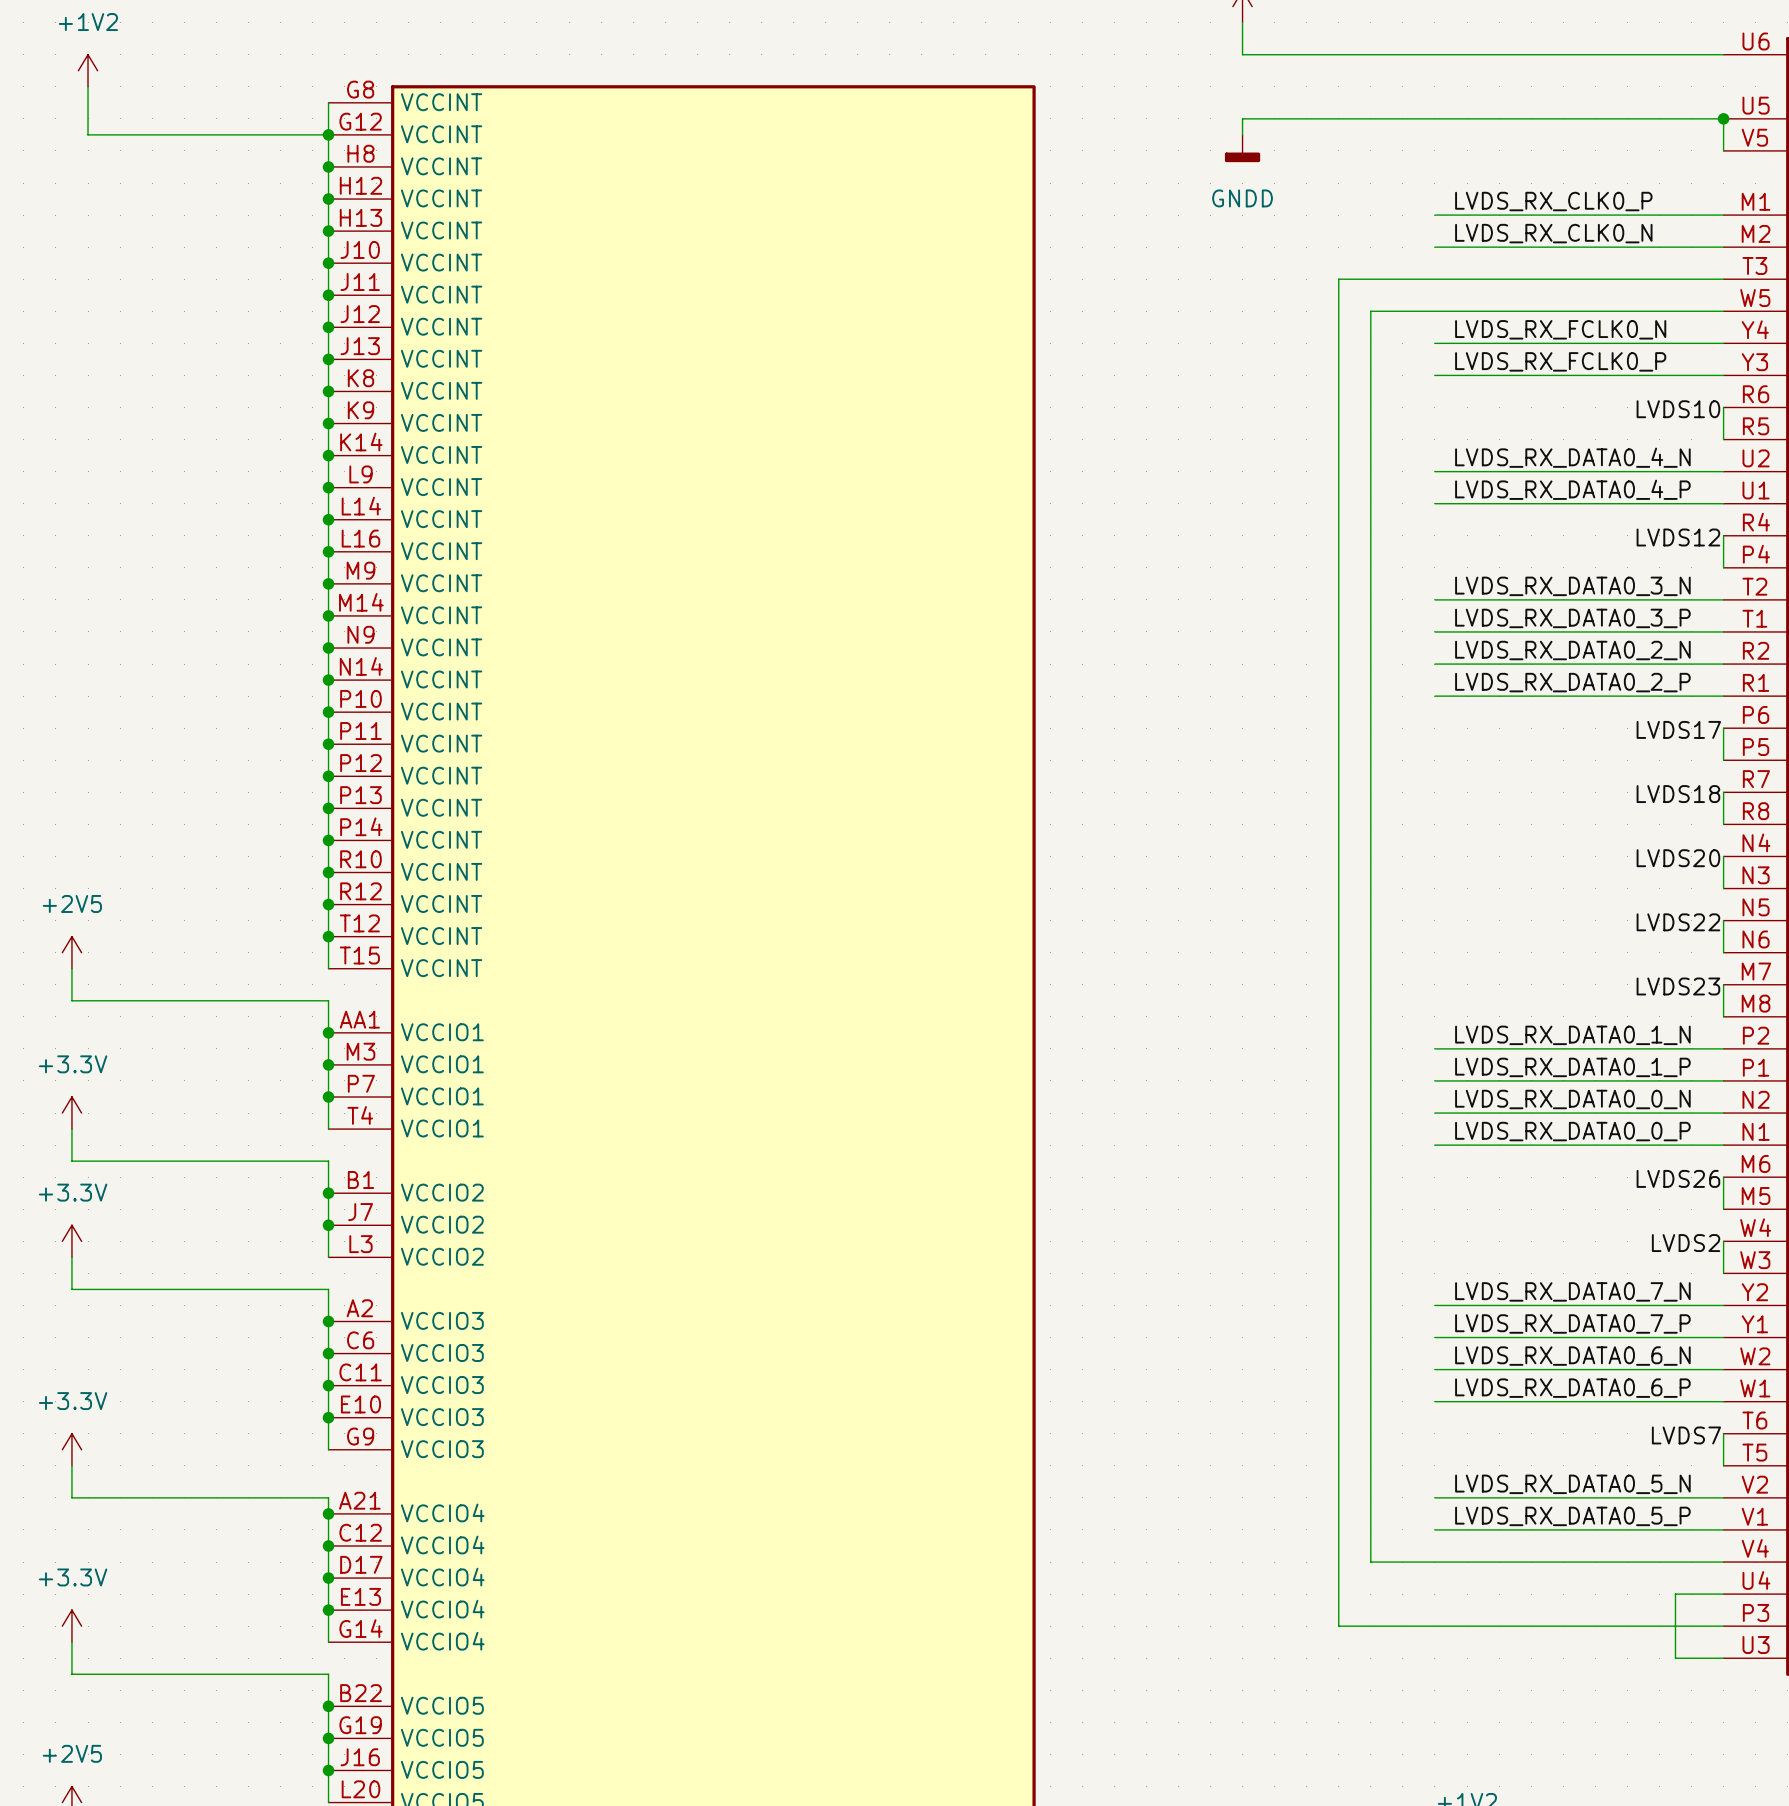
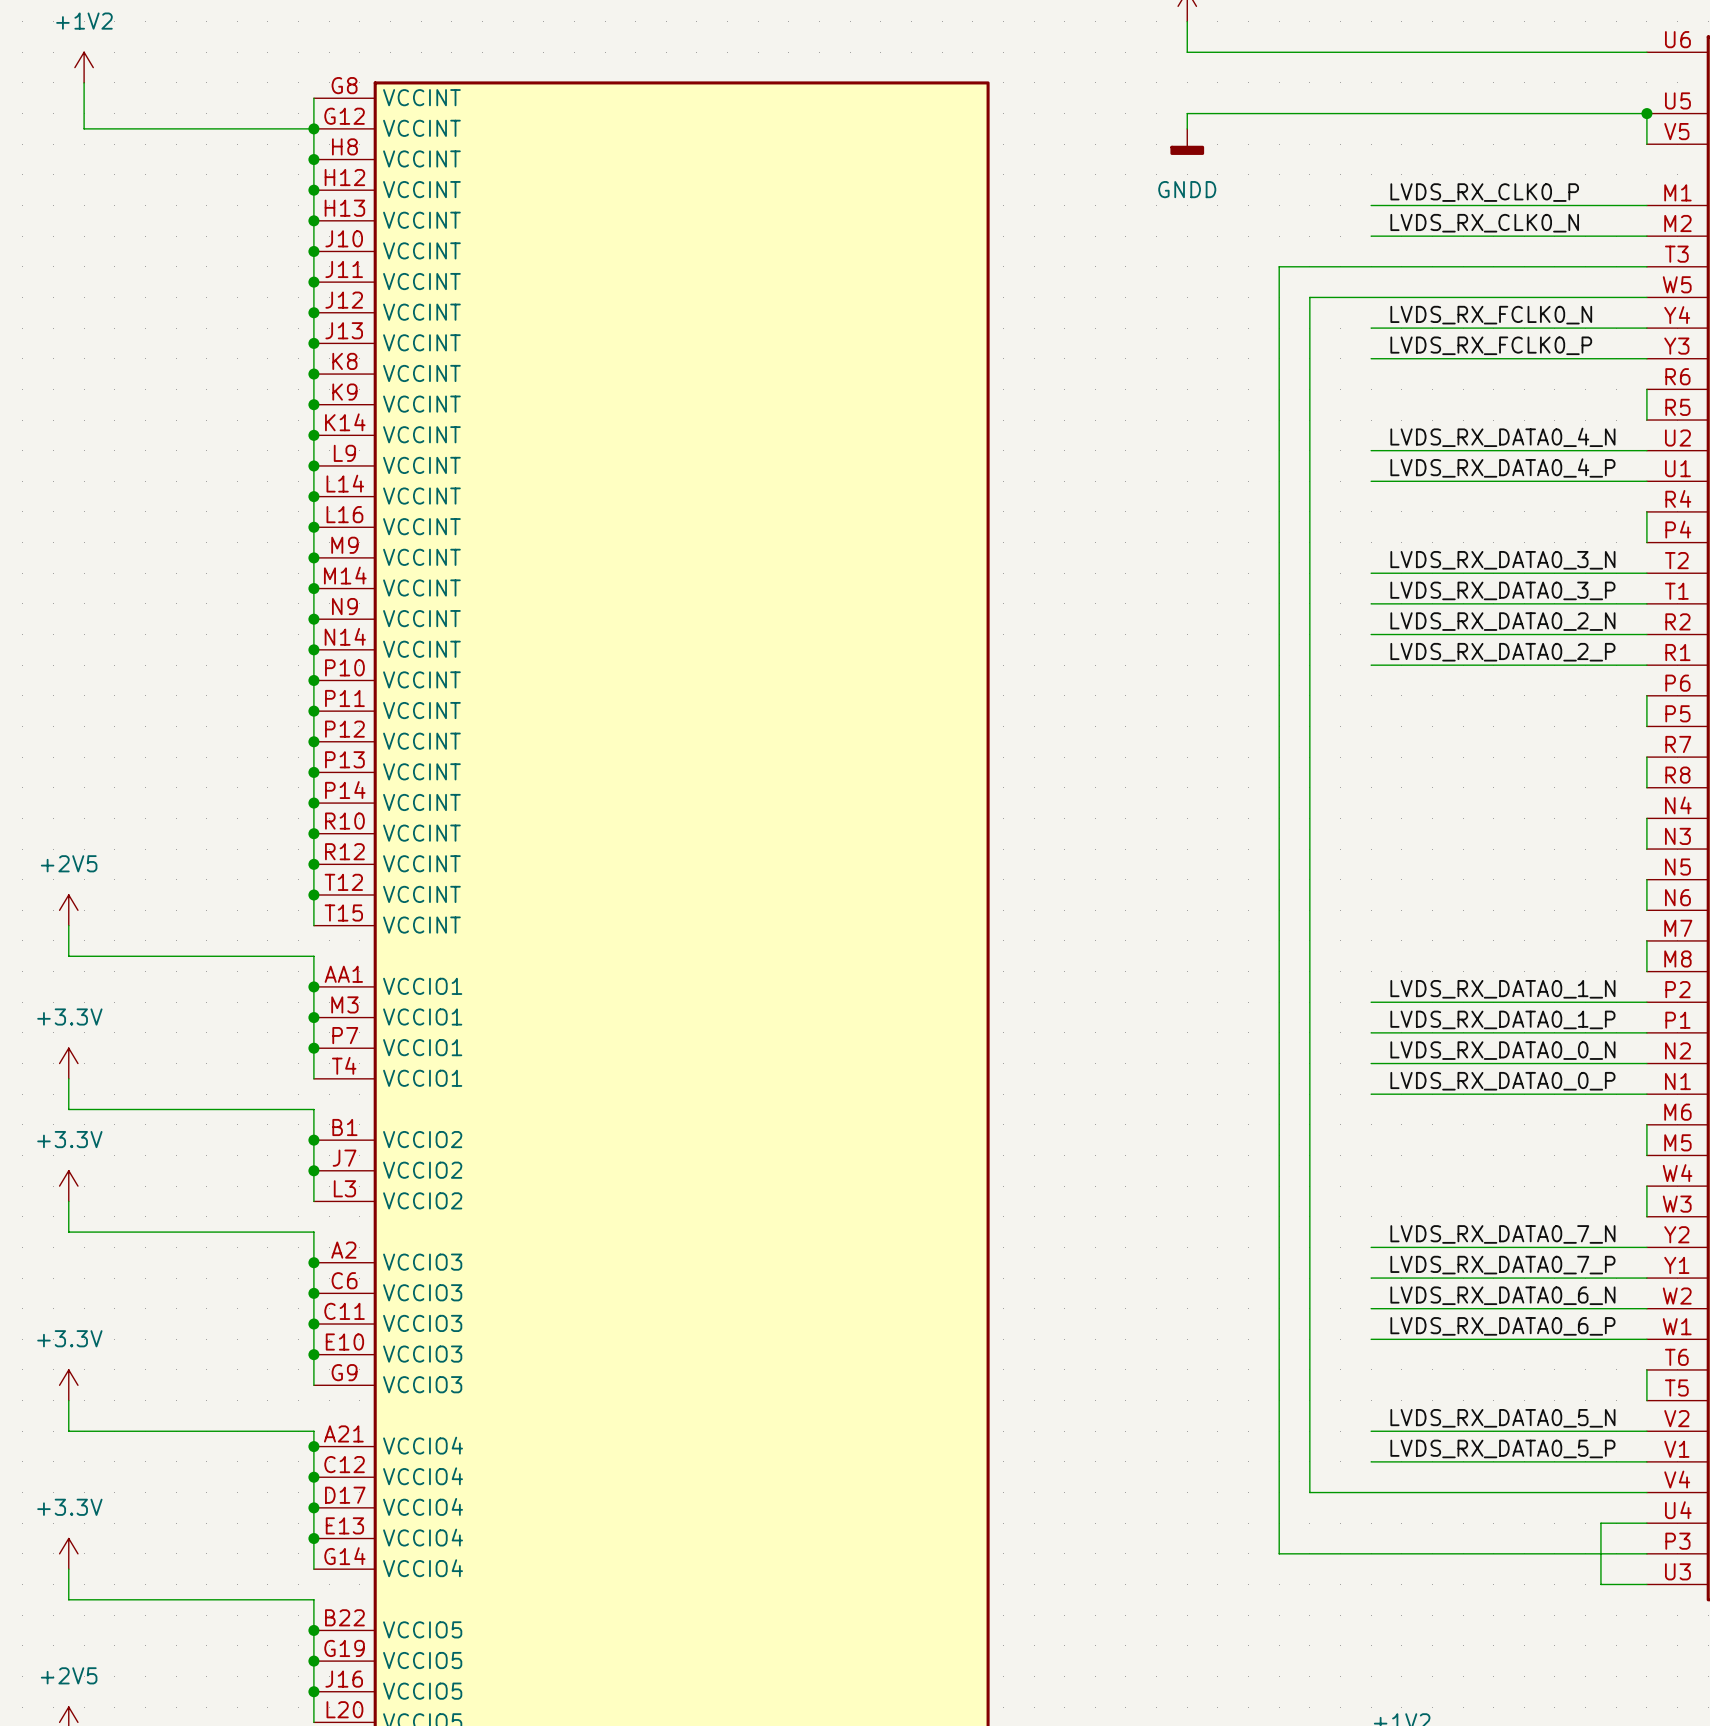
label: LVDS10 (1678, 409) -> none
label: LVDS12 (1678, 537) -> none
label: LVDS17 (1678, 729) -> none
label: LVDS18 (1678, 794) -> none
label: LVDS20 (1678, 858) -> none
label: LVDS22 (1678, 922) -> none
label: LVDS23 (1678, 986) -> none
label: LVDS26 (1678, 1178) -> none
label: LVDS2 (1686, 1243) -> none
label: LVDS7 (1686, 1435) -> none

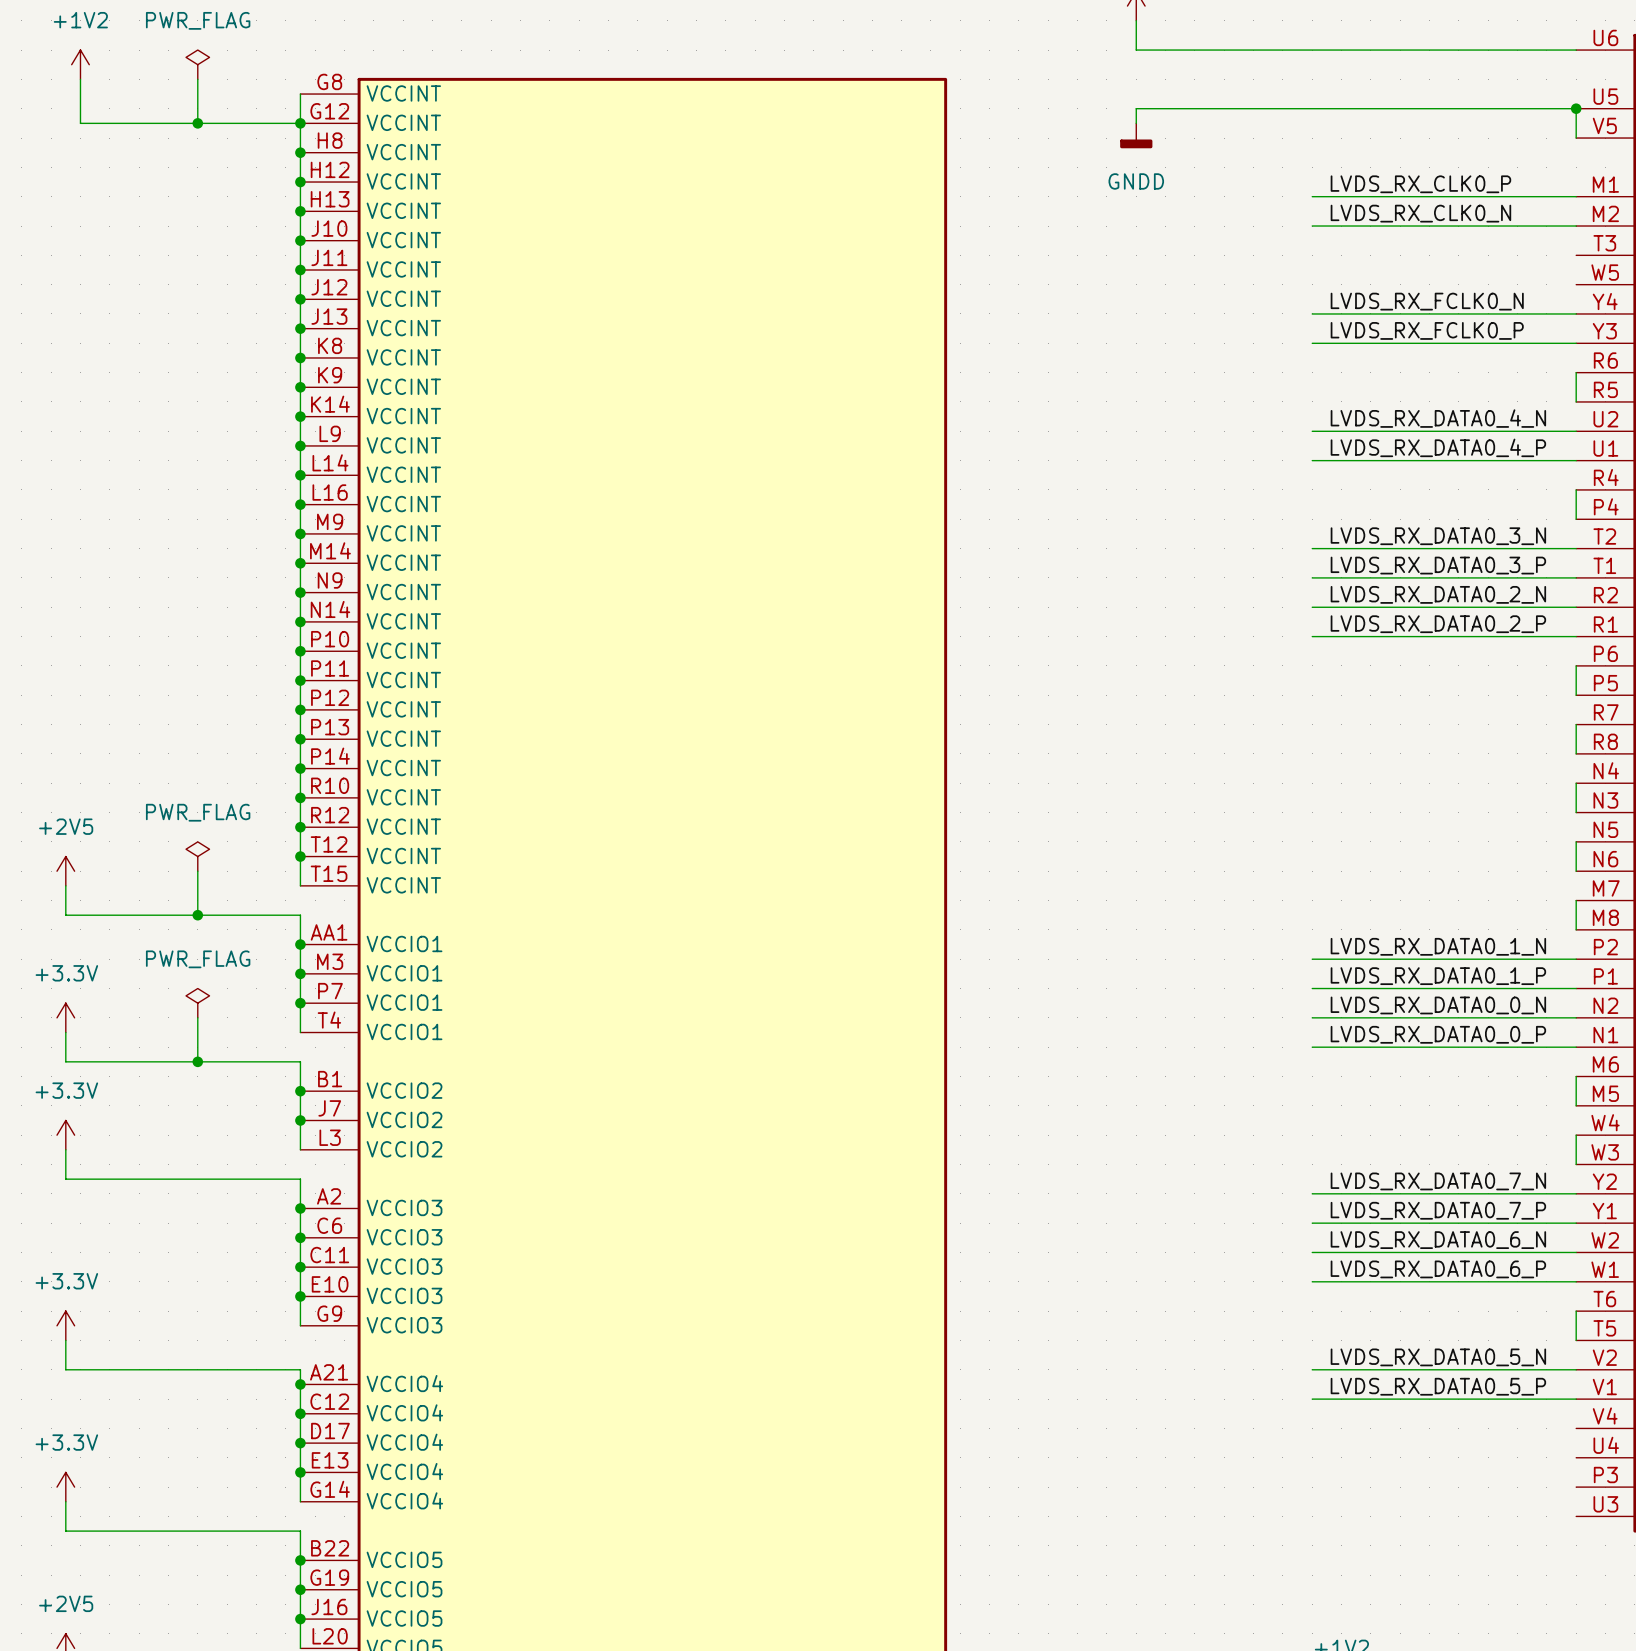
power symbol: none -> PWR_FLAG (197, 64)
wire: none -> (197, 79) (197, 123)
junction: none -> (197, 123)
wire: (1646, 266) (1279, 266) (1279, 1553) (1646, 1553) -> none
wire: (1646, 297) (1309, 297) (1309, 1492) (1646, 1492) -> none
power symbol: none -> PWR_FLAG (197, 856)
wire: none -> (197, 871) (197, 915)
junction: none -> (197, 915)
power symbol: none -> PWR_FLAG (197, 1003)
wire: none -> (197, 1017) (197, 1061)
junction: none -> (197, 1061)
wire: (1646, 1523) (1600, 1523) (1600, 1584) (1646, 1584) -> none

